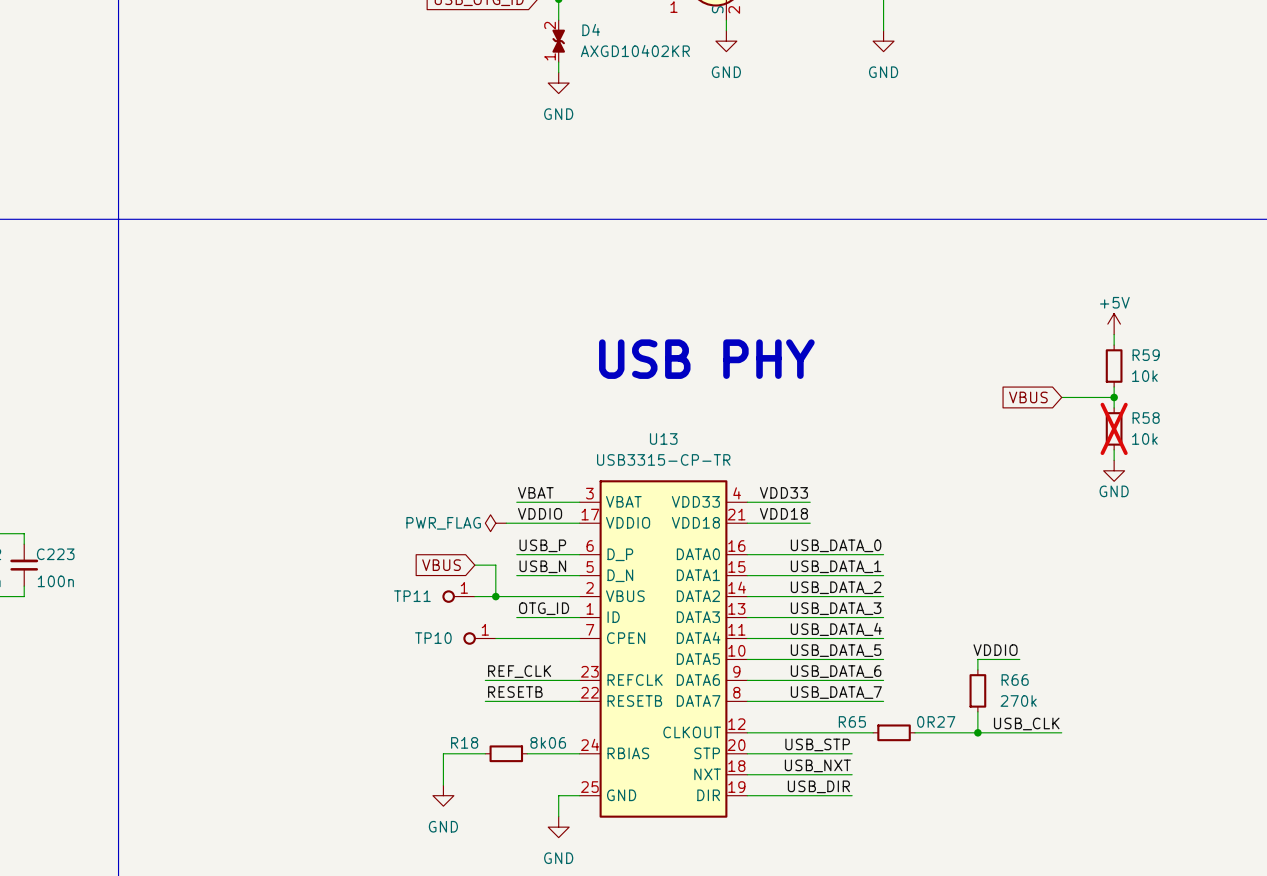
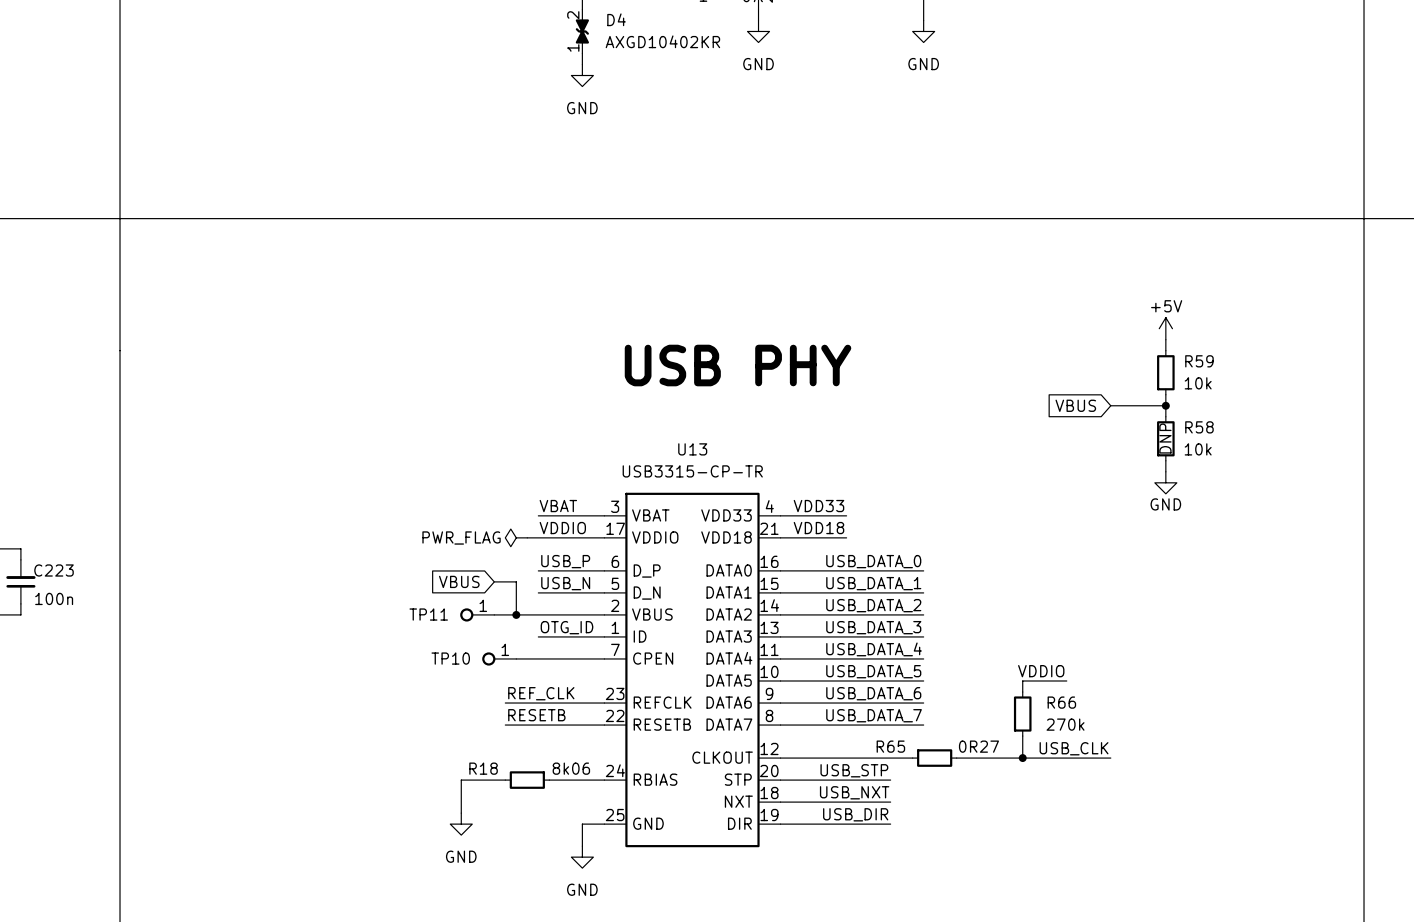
R58 text: none -> DNP (1165, 438)
R58 do-not-place cross: (1114, 428) -> none

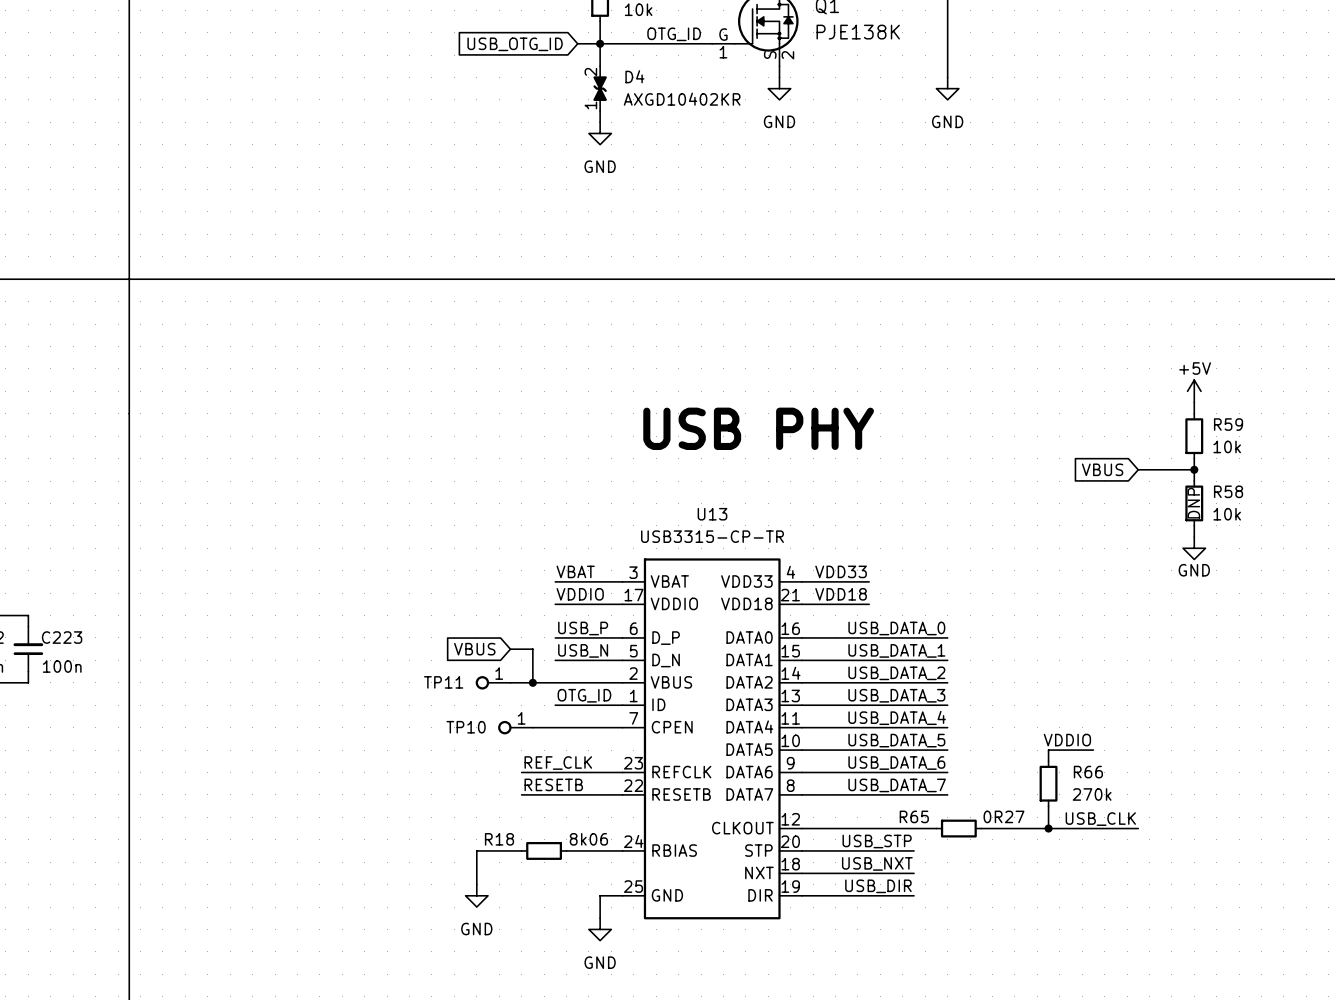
power symbol: PWR_FLAG (516, 537) -> none
wire: (527, 537) (538, 537) -> none

